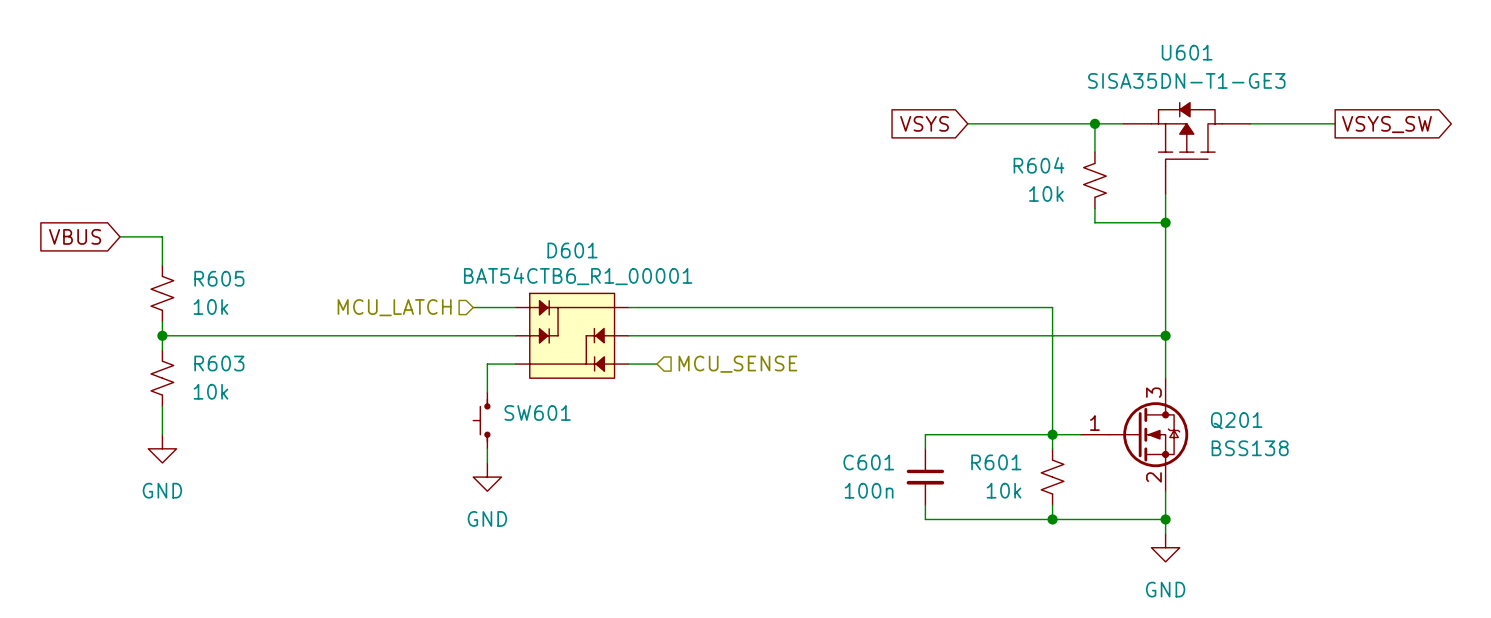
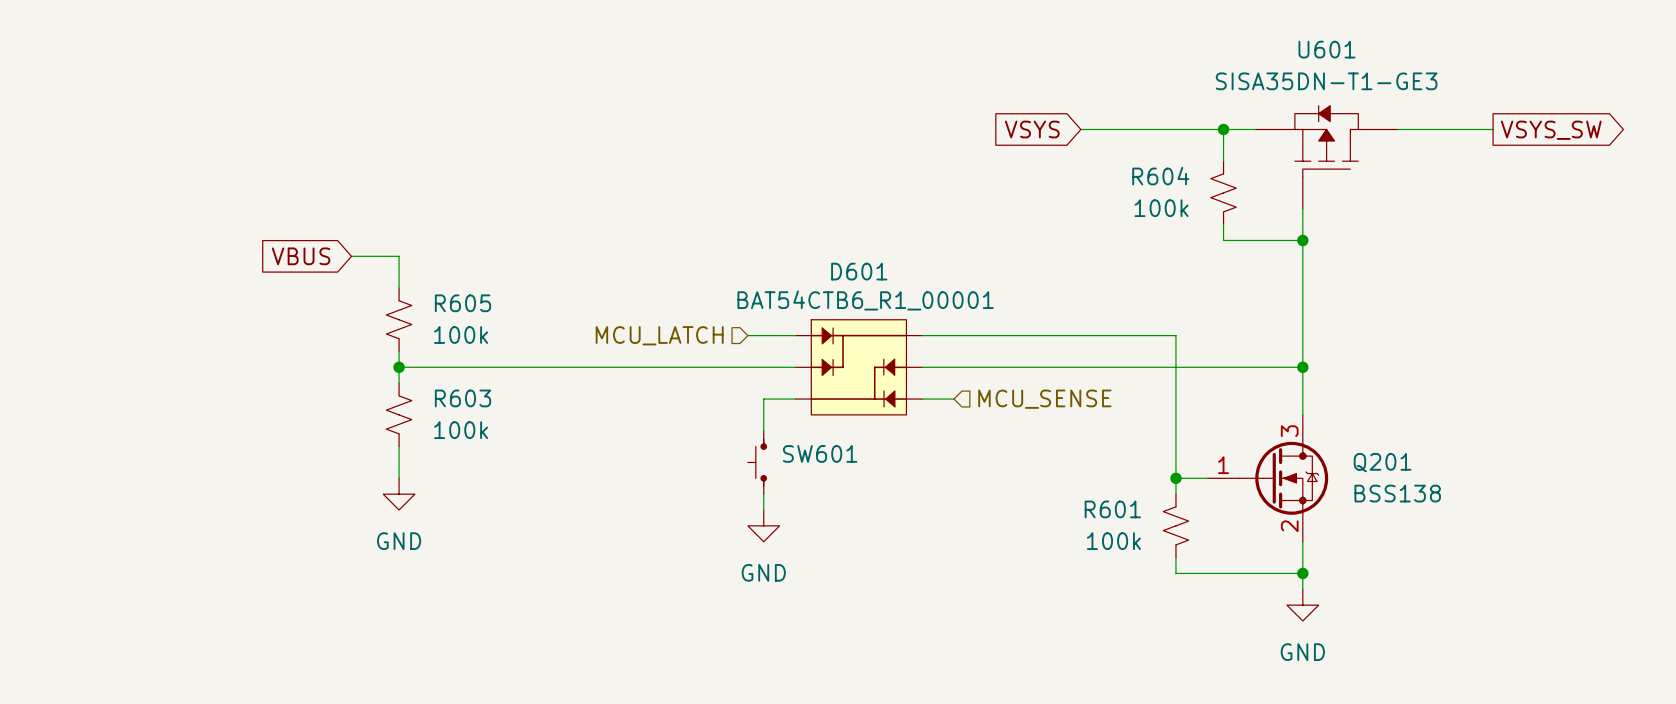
R604 value: 10k (1046, 193) -> 100k (1161, 208)
global label position: VBUS (75, 236) -> VBUS (301, 256)
wire: (120, 236) (162, 236) (162, 265) -> (351, 256) (399, 256) (399, 288)
R605 position: (162, 293) -> (399, 319)
R605 value: 10k (210, 307) -> 100k (461, 335)
hierarchical label position: MCU_LATCH (394, 307) -> MCU_LATCH (659, 335)
wire: (473, 307) (515, 307) -> none
wire: (628, 307) (671, 307) -> none
wire: (162, 321) (162, 349) -> (399, 351) (399, 383)
wire: (162, 335) (360, 335) -> none
junction: (162, 335) -> none
junction: none -> (399, 367)
D601 position: (572, 335) -> (858, 367)
wire: (515, 364) (487, 364) (487, 392) -> (795, 399) (763, 399) (763, 430)
wire: (628, 364) (656, 364) -> (922, 399) (954, 399)
hierarchical label position: MCU_SENSE (737, 364) -> MCU_SENSE (1044, 399)
R603 position: (162, 378) -> (399, 414)
R603 value: 10k (210, 391) -> 100k (461, 430)
wire: (162, 406) (162, 434) -> (399, 446) (399, 478)
SW601 position: (481, 420) -> (757, 462)
wire: (1052, 434) (925, 434) (925, 448) -> none
power symbol: GND (162, 448) -> none
power symbol: none -> GND (399, 494)
wire: (487, 448) (487, 462) -> (763, 494) (763, 510)
power symbol: GND (487, 477) -> none
power symbol: none -> GND (763, 525)
C601: 100n (925, 477) -> none
R601 flip: as is (1052, 477) -> left-right (1175, 525)
R601 value: 10k (1004, 490) -> 100k (1113, 541)
wire: (925, 505) (925, 519) (1052, 519) -> none
junction: (1052, 519) -> none

